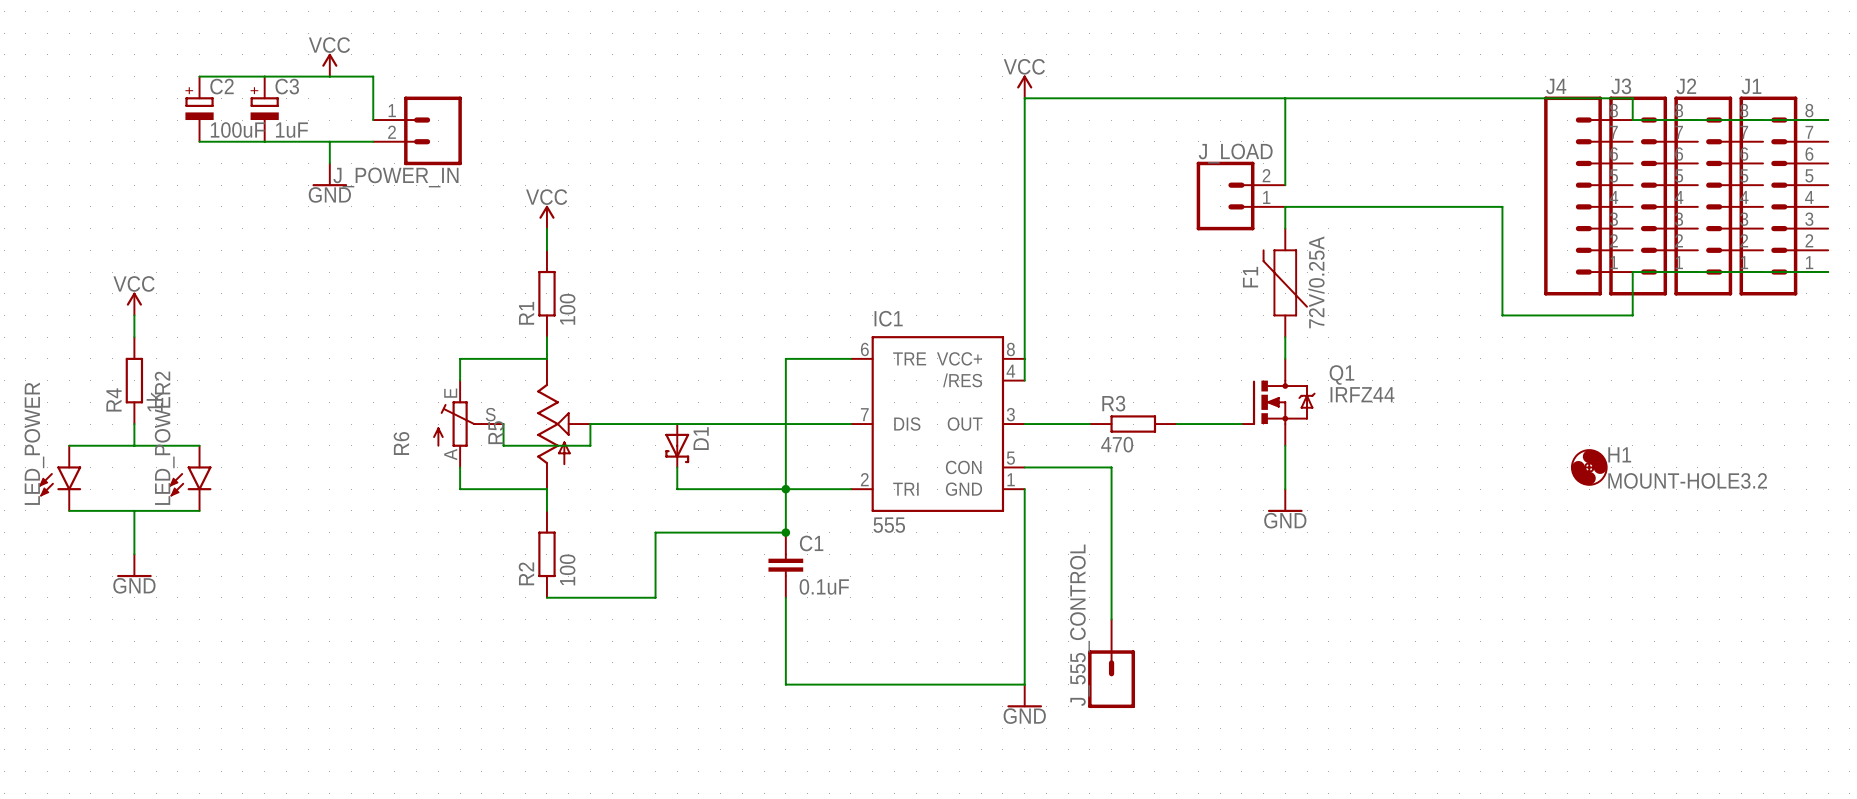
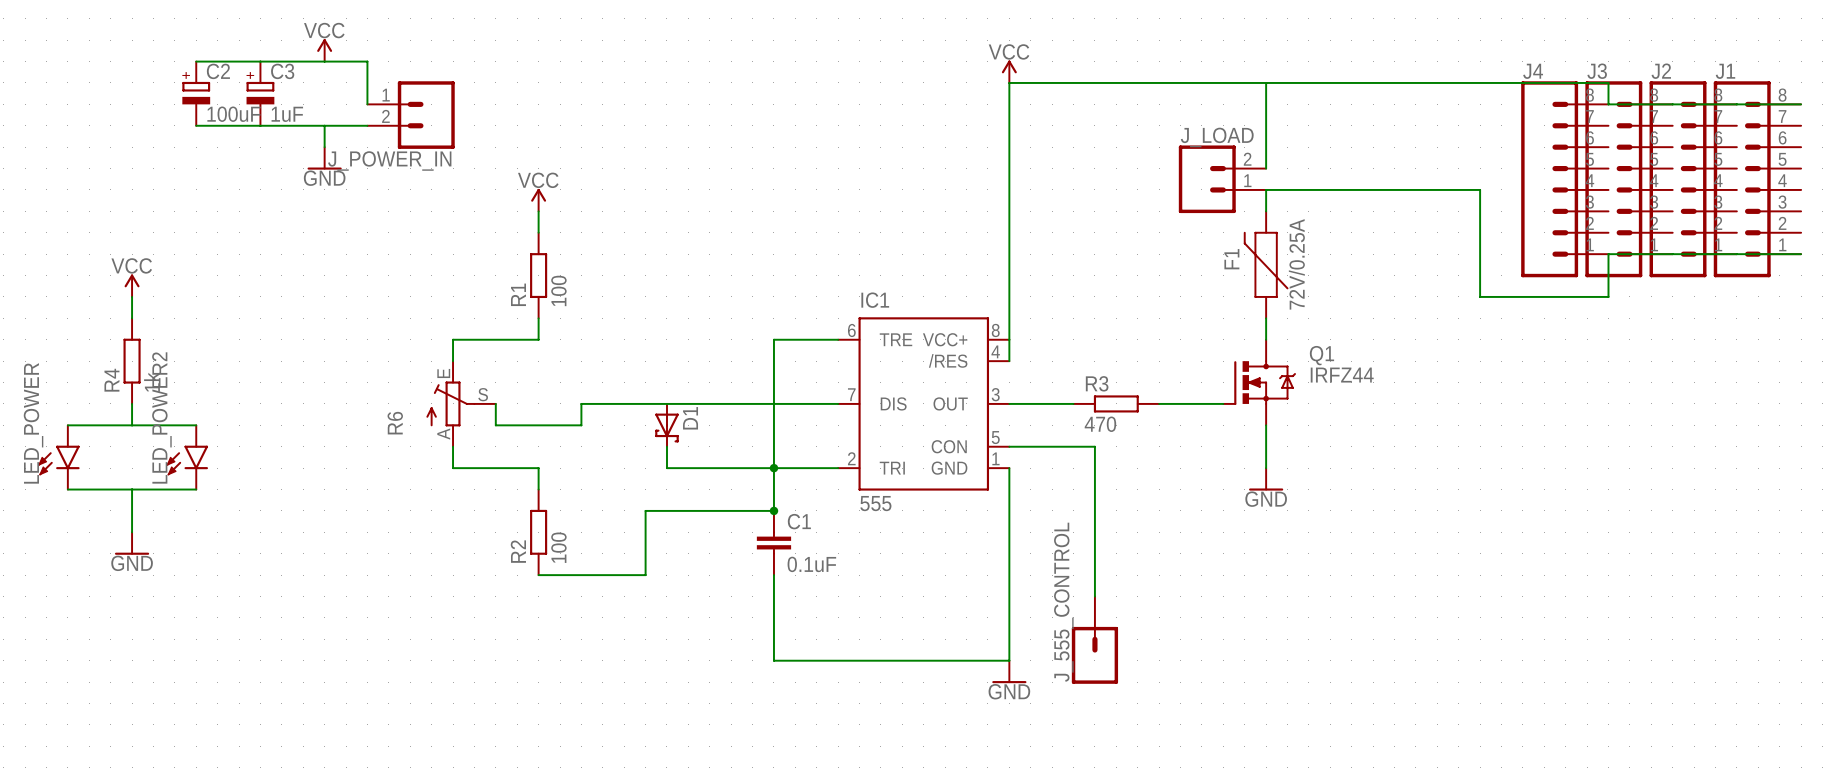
R5: (563, 424) -> none
H1: MOUNT-HOLE3.2 (1589, 467) -> none

